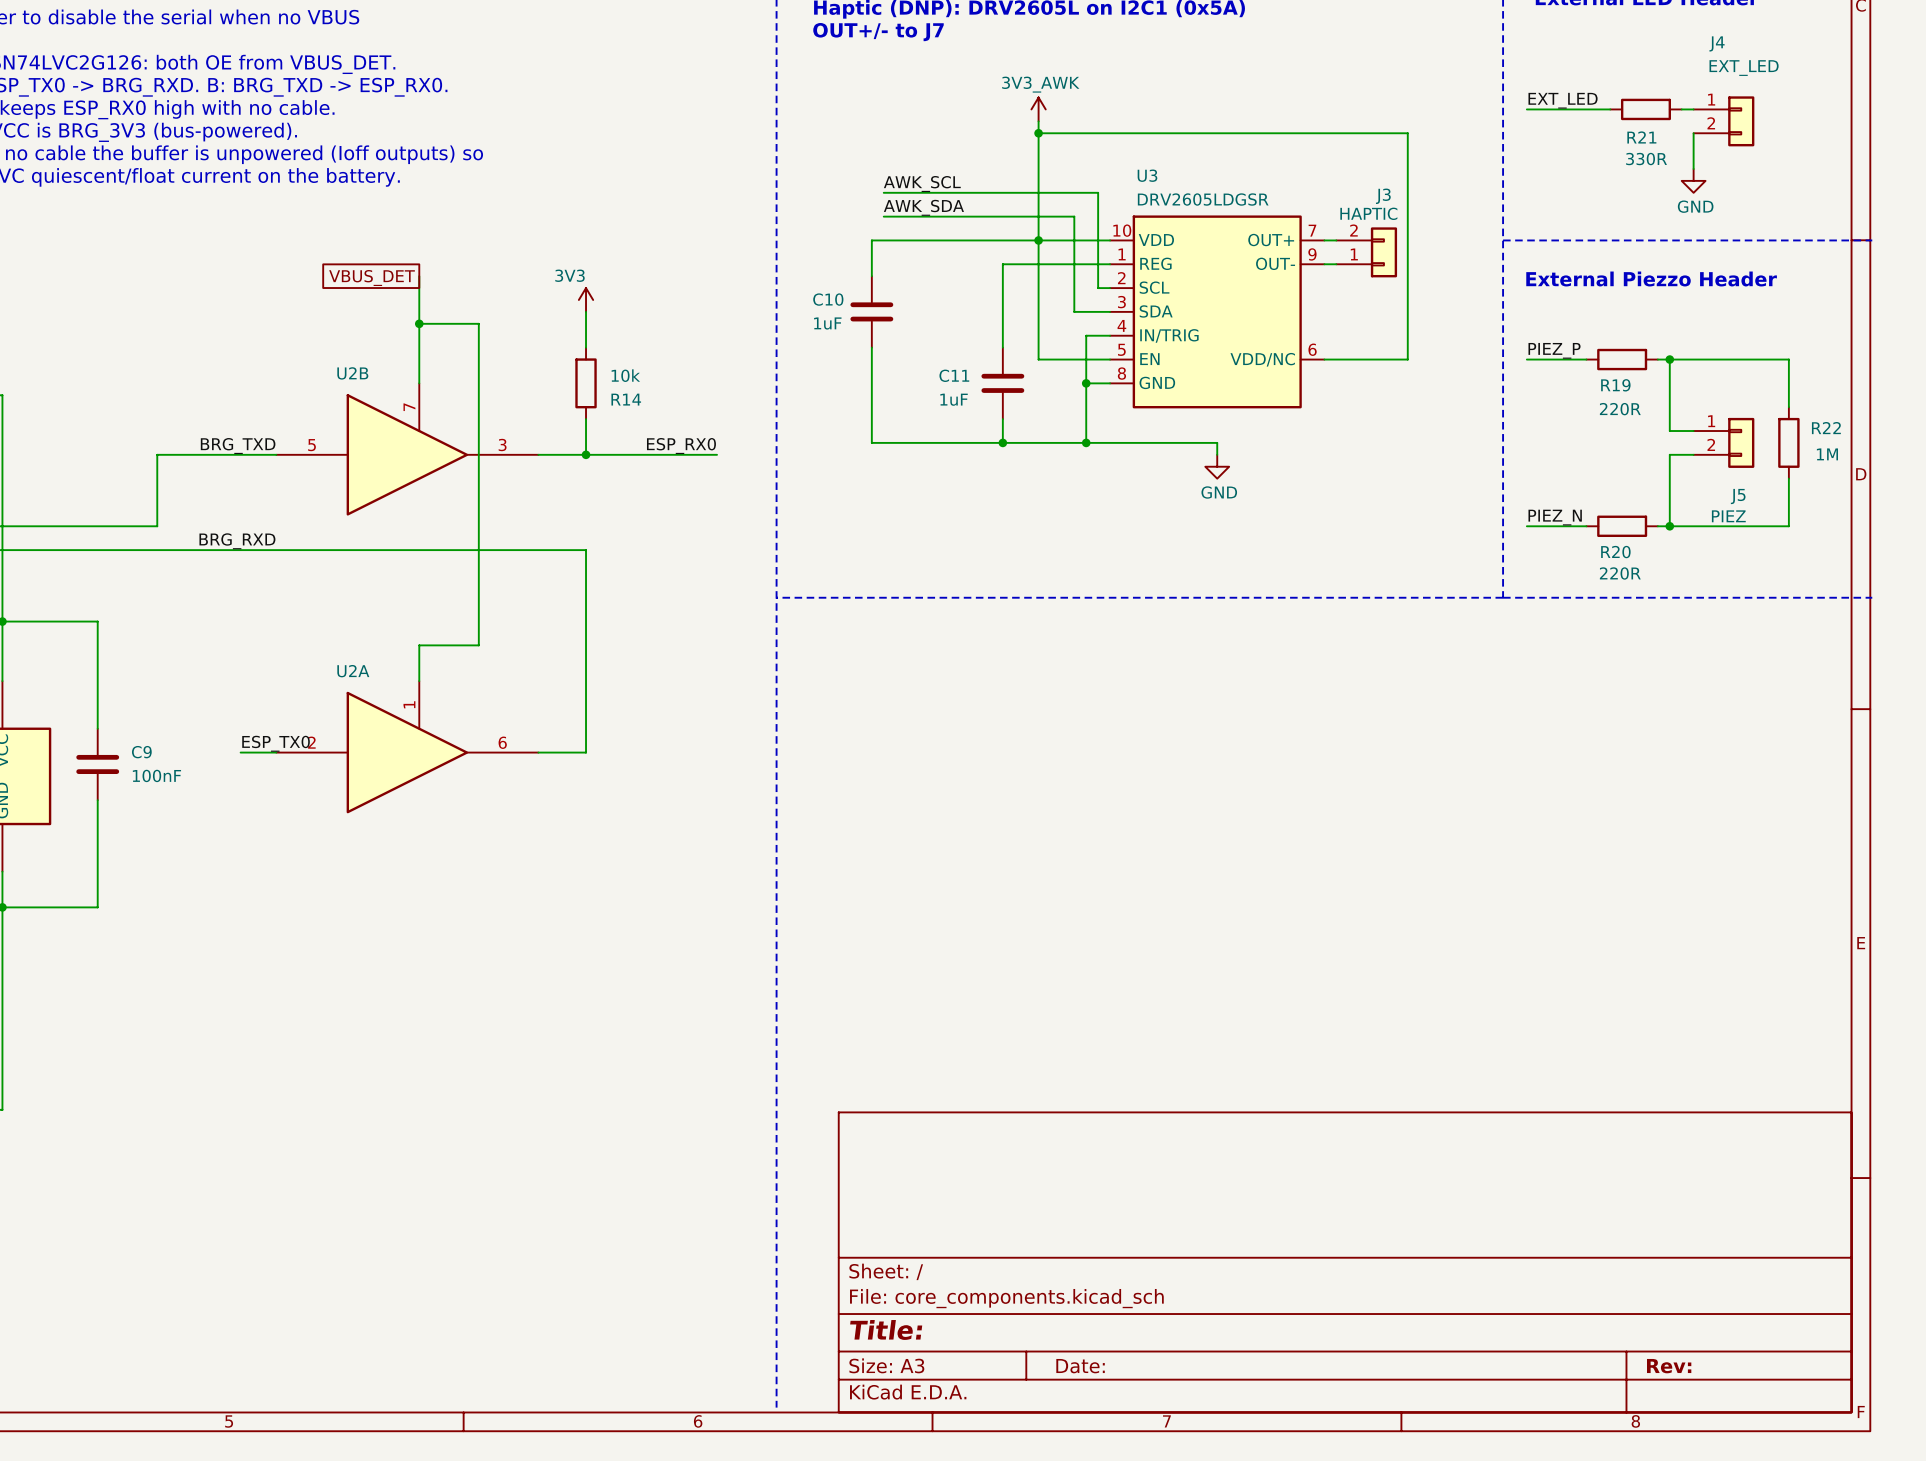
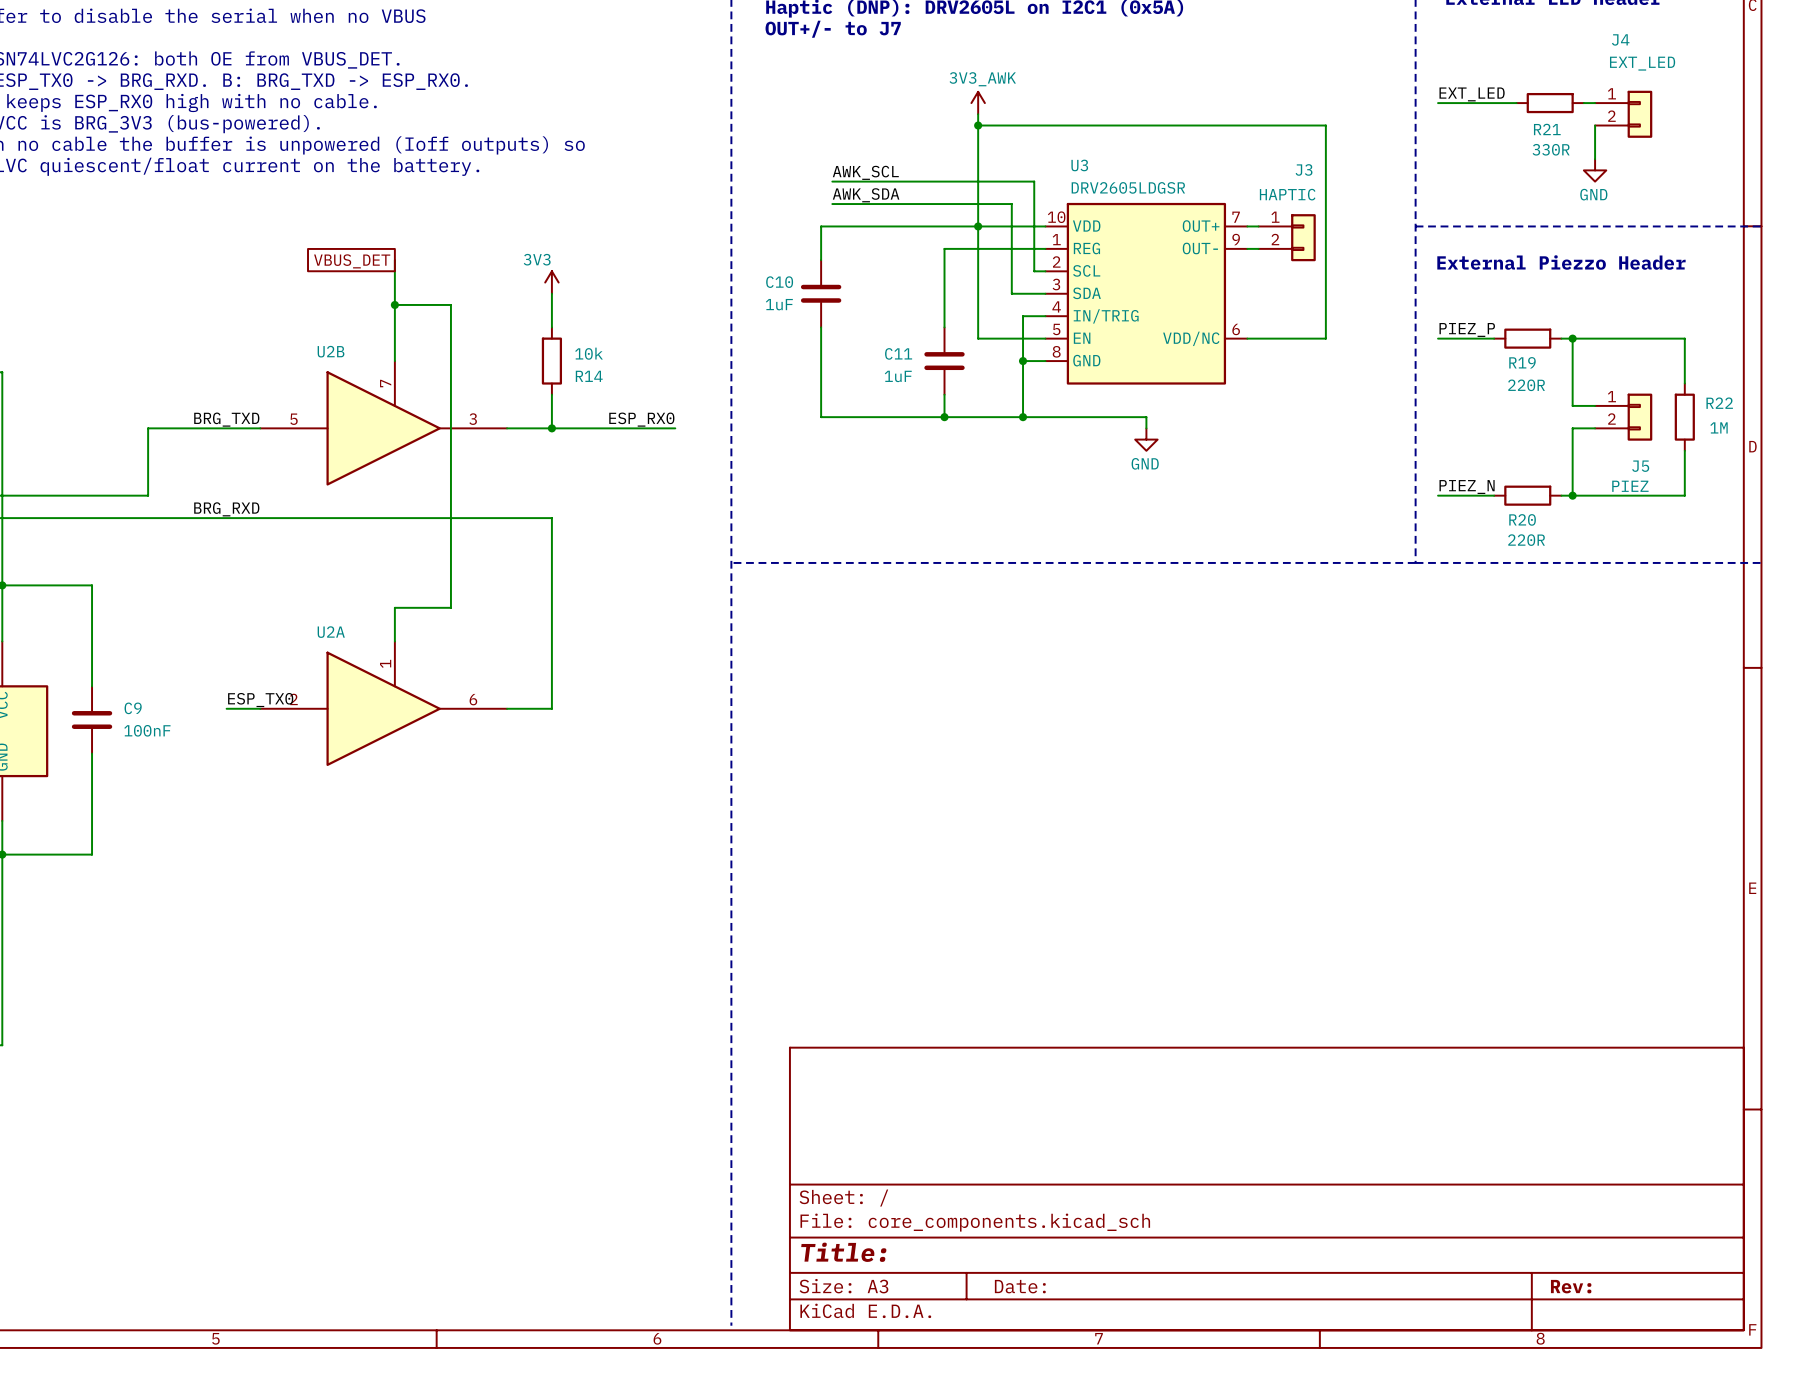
J3 flip: as is (1383, 252) -> up-down (1303, 237)

